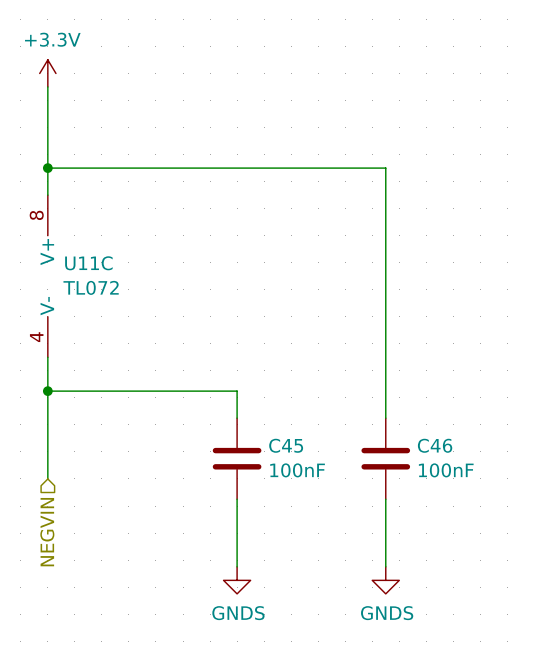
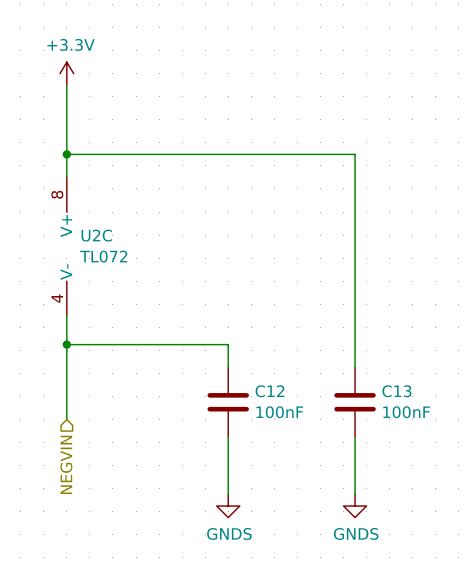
U11C name: U11C (88, 263) -> U2C (96, 235)
C45 name: C45 (286, 445) -> C12 (269, 391)
C46 name: C46 (435, 445) -> C13 (396, 391)

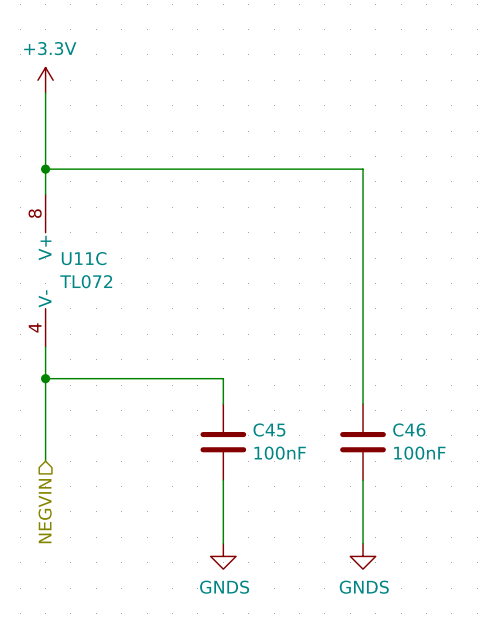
U2C name: U2C (96, 235) -> U11C (84, 258)
C12 name: C12 (269, 391) -> C45 (269, 430)
C13 name: C13 (396, 391) -> C46 (409, 430)

